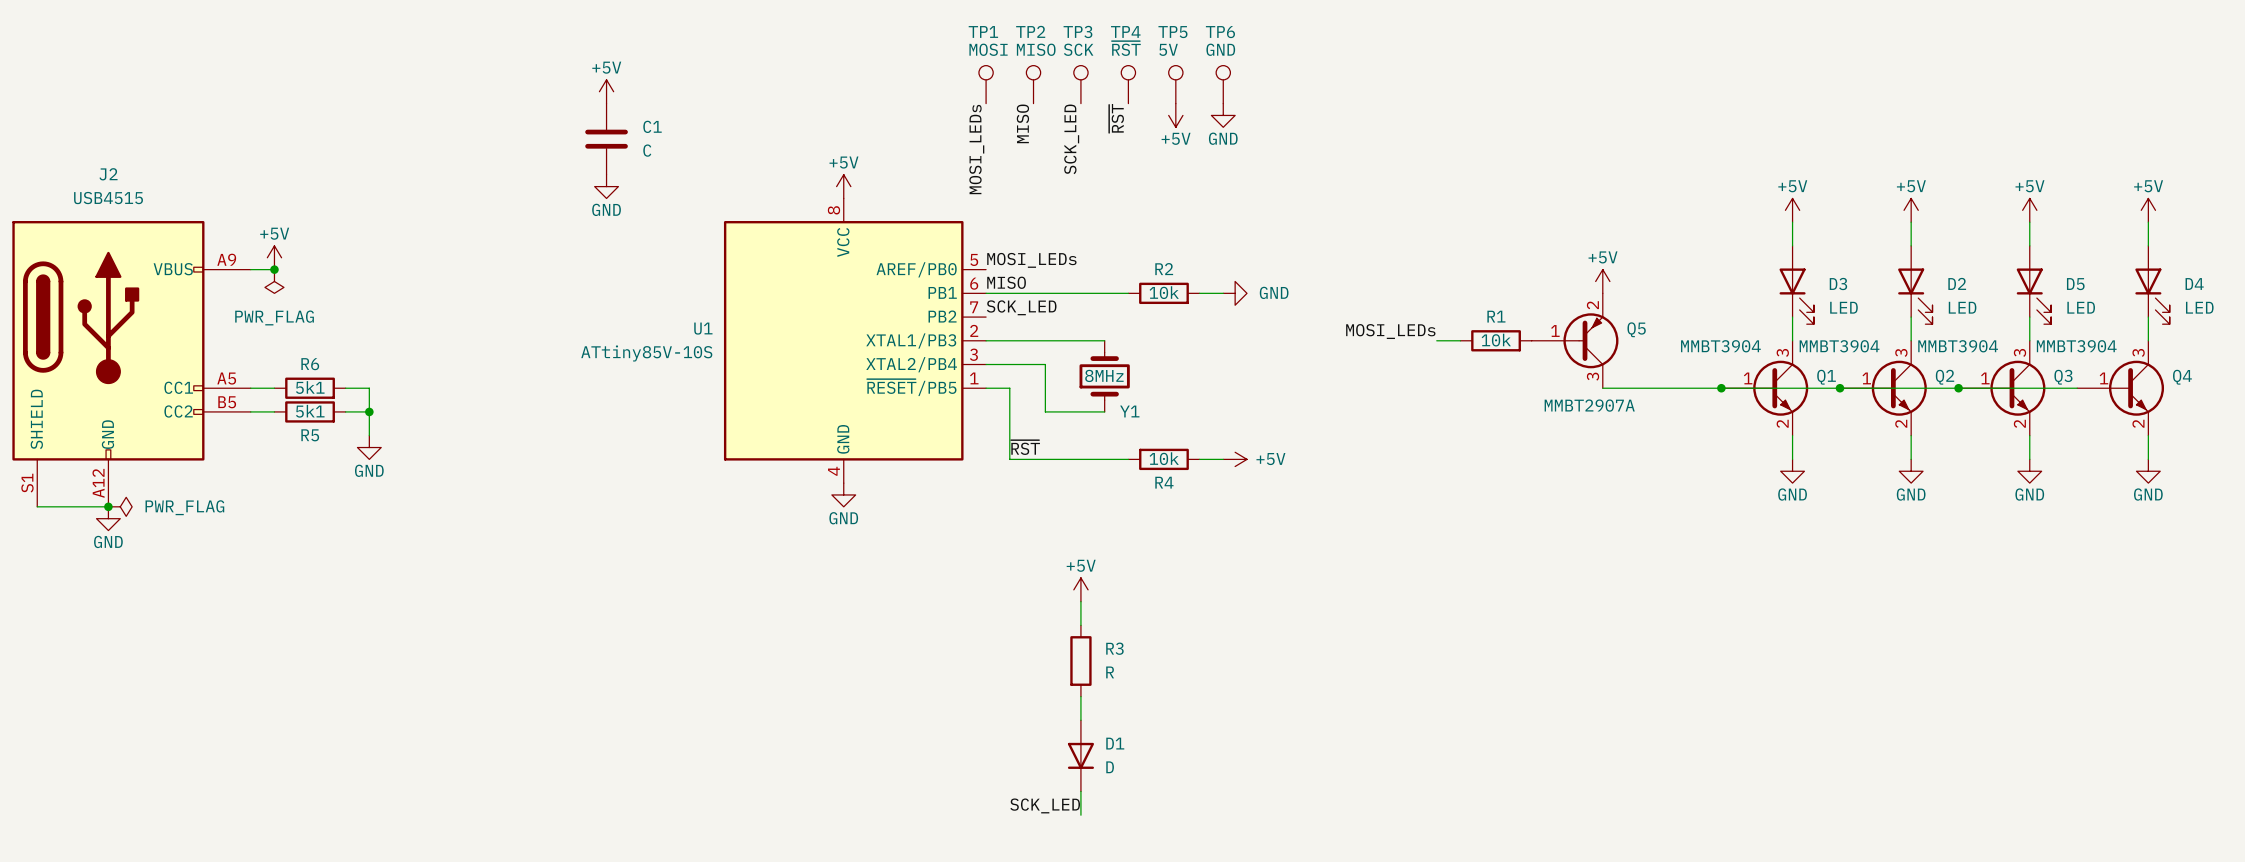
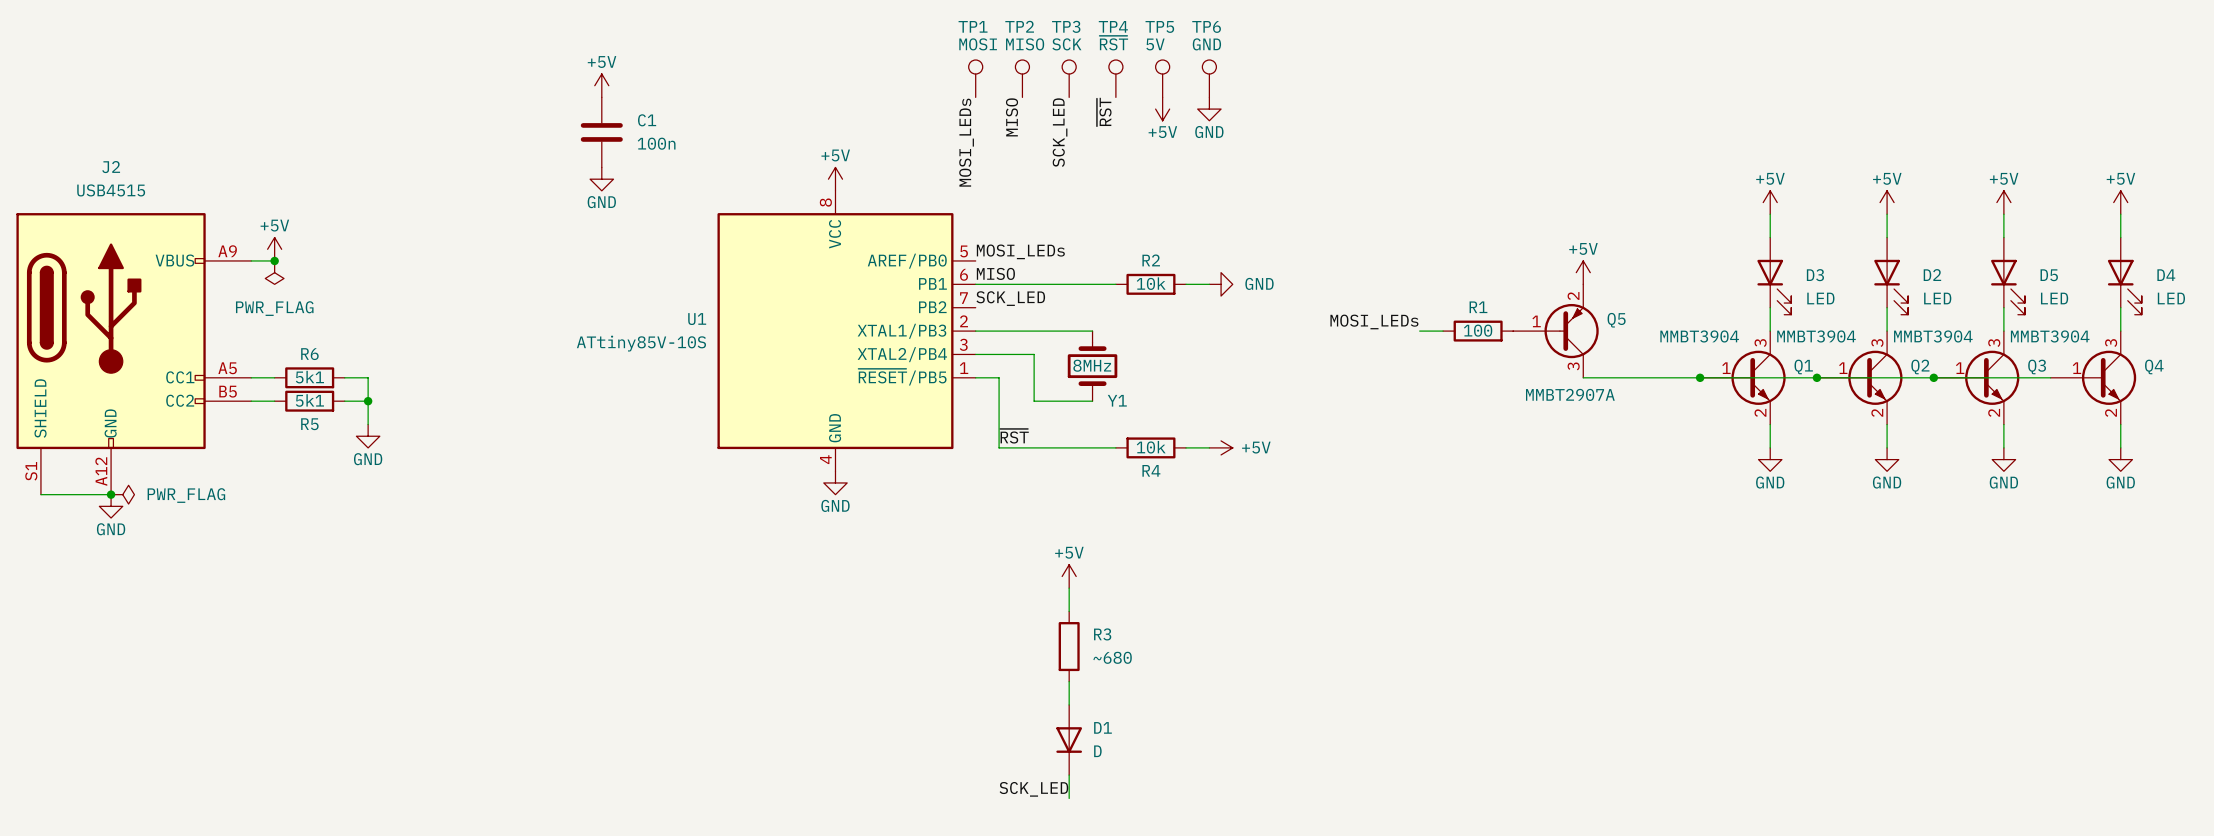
C1 value: C (647, 150) -> 100n (656, 143)
R1 value: 10k (1496, 340) -> 100 (1478, 330)
R3 value: R (1110, 672) -> ~680 (1112, 657)

